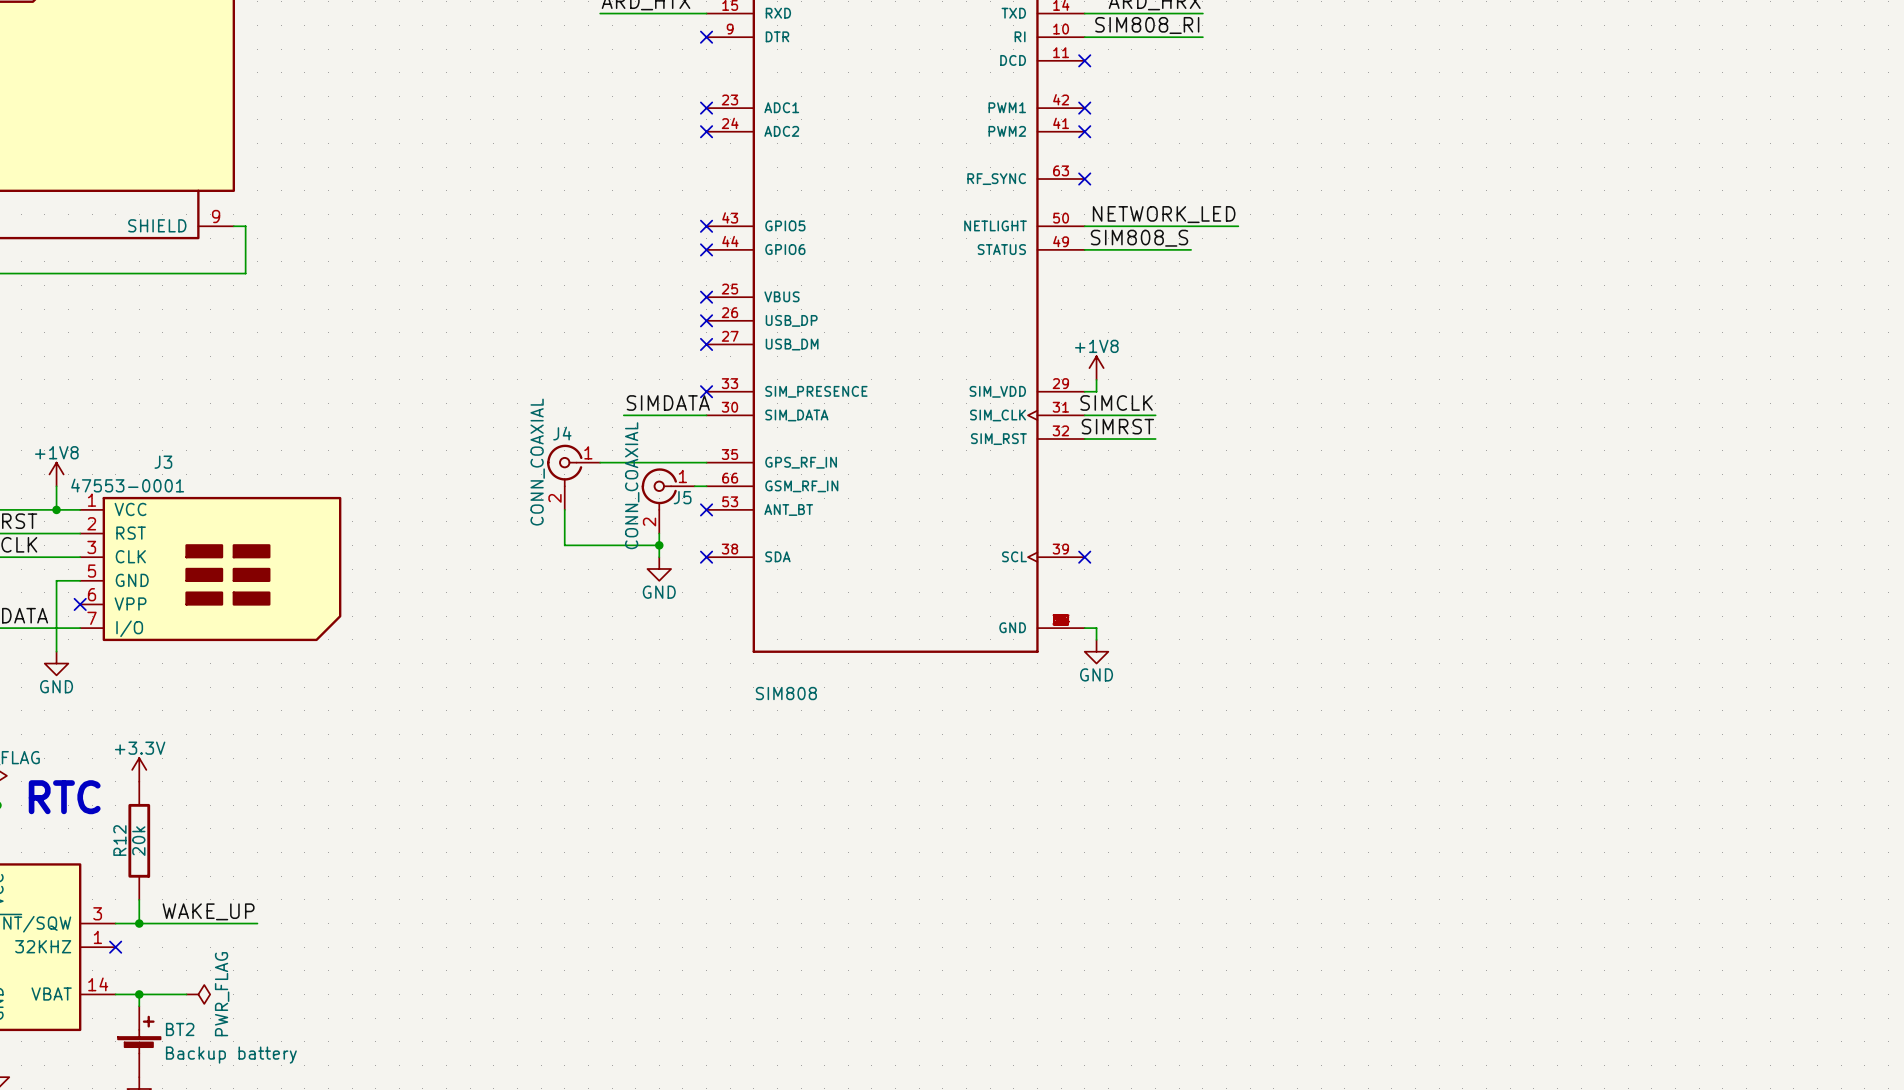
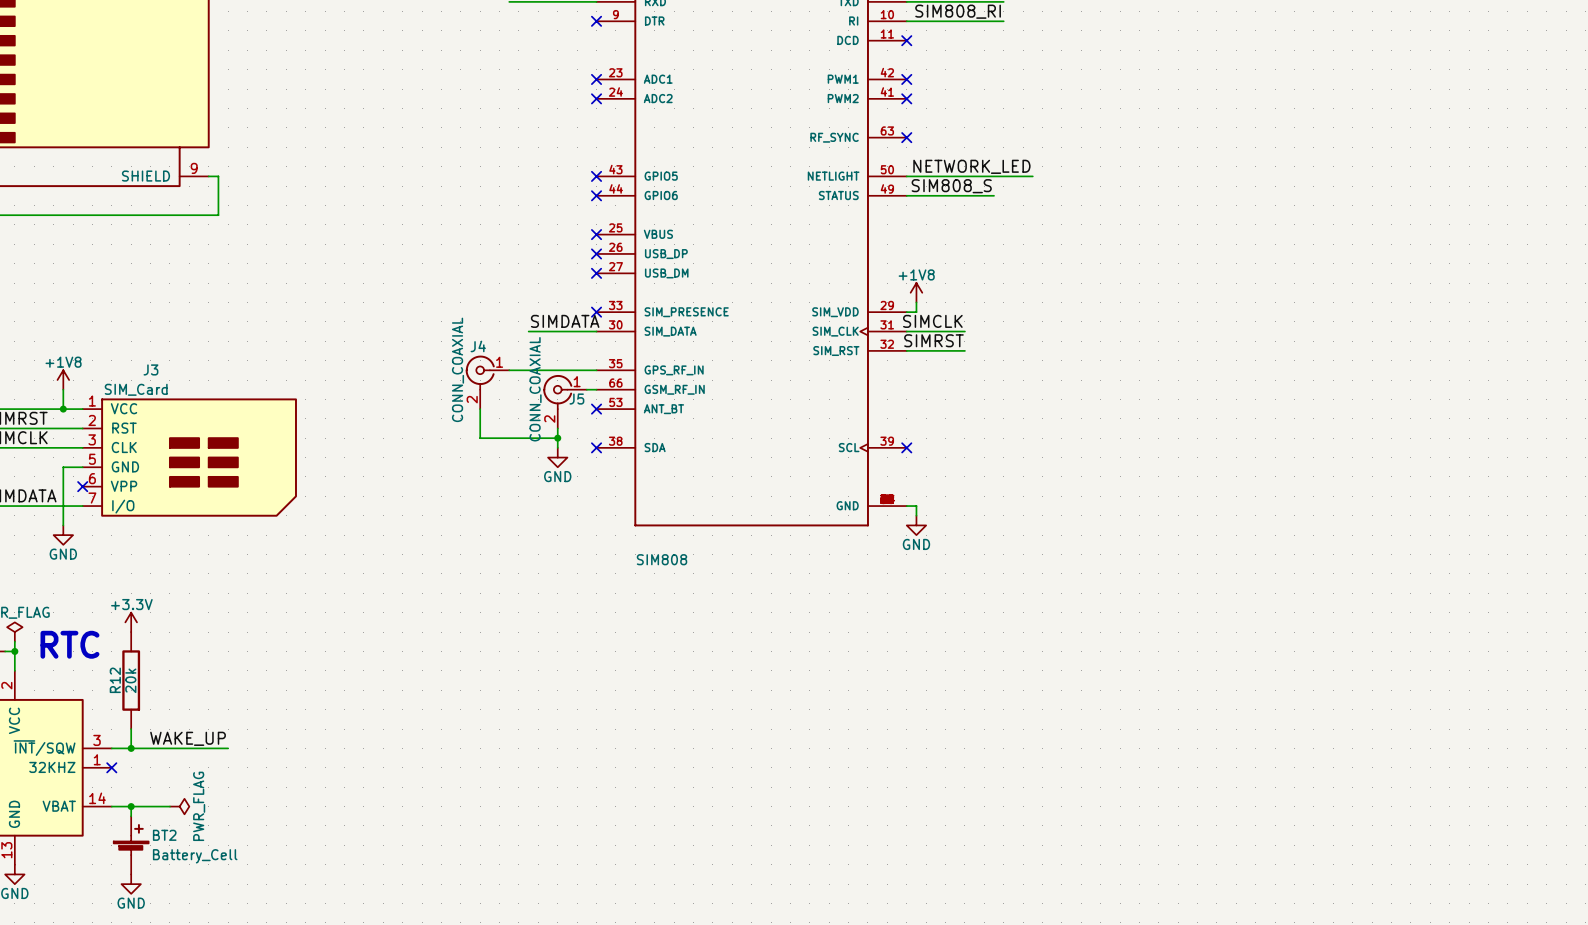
J3 value: 47553-0001 (127, 485) -> SIM_Card (136, 389)
BT2 value: Backup battery (231, 1055) -> Battery_Cell (195, 856)

